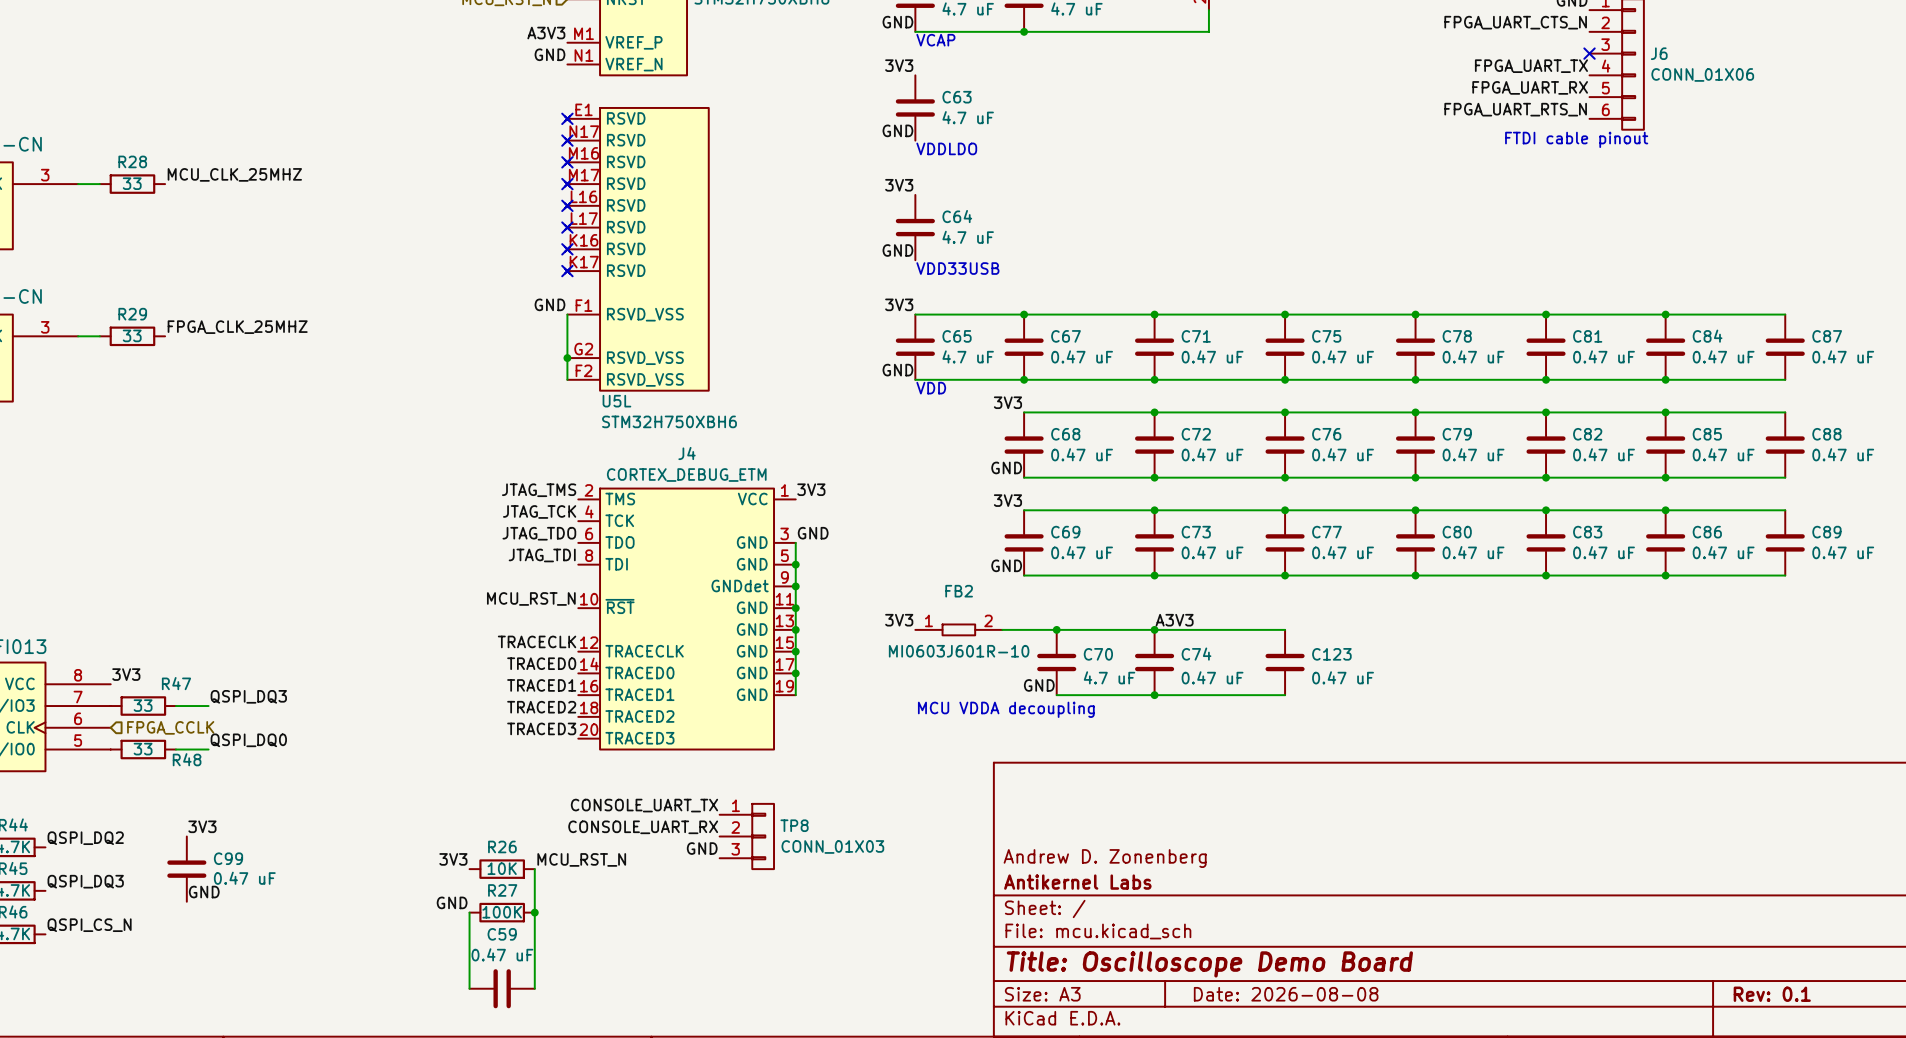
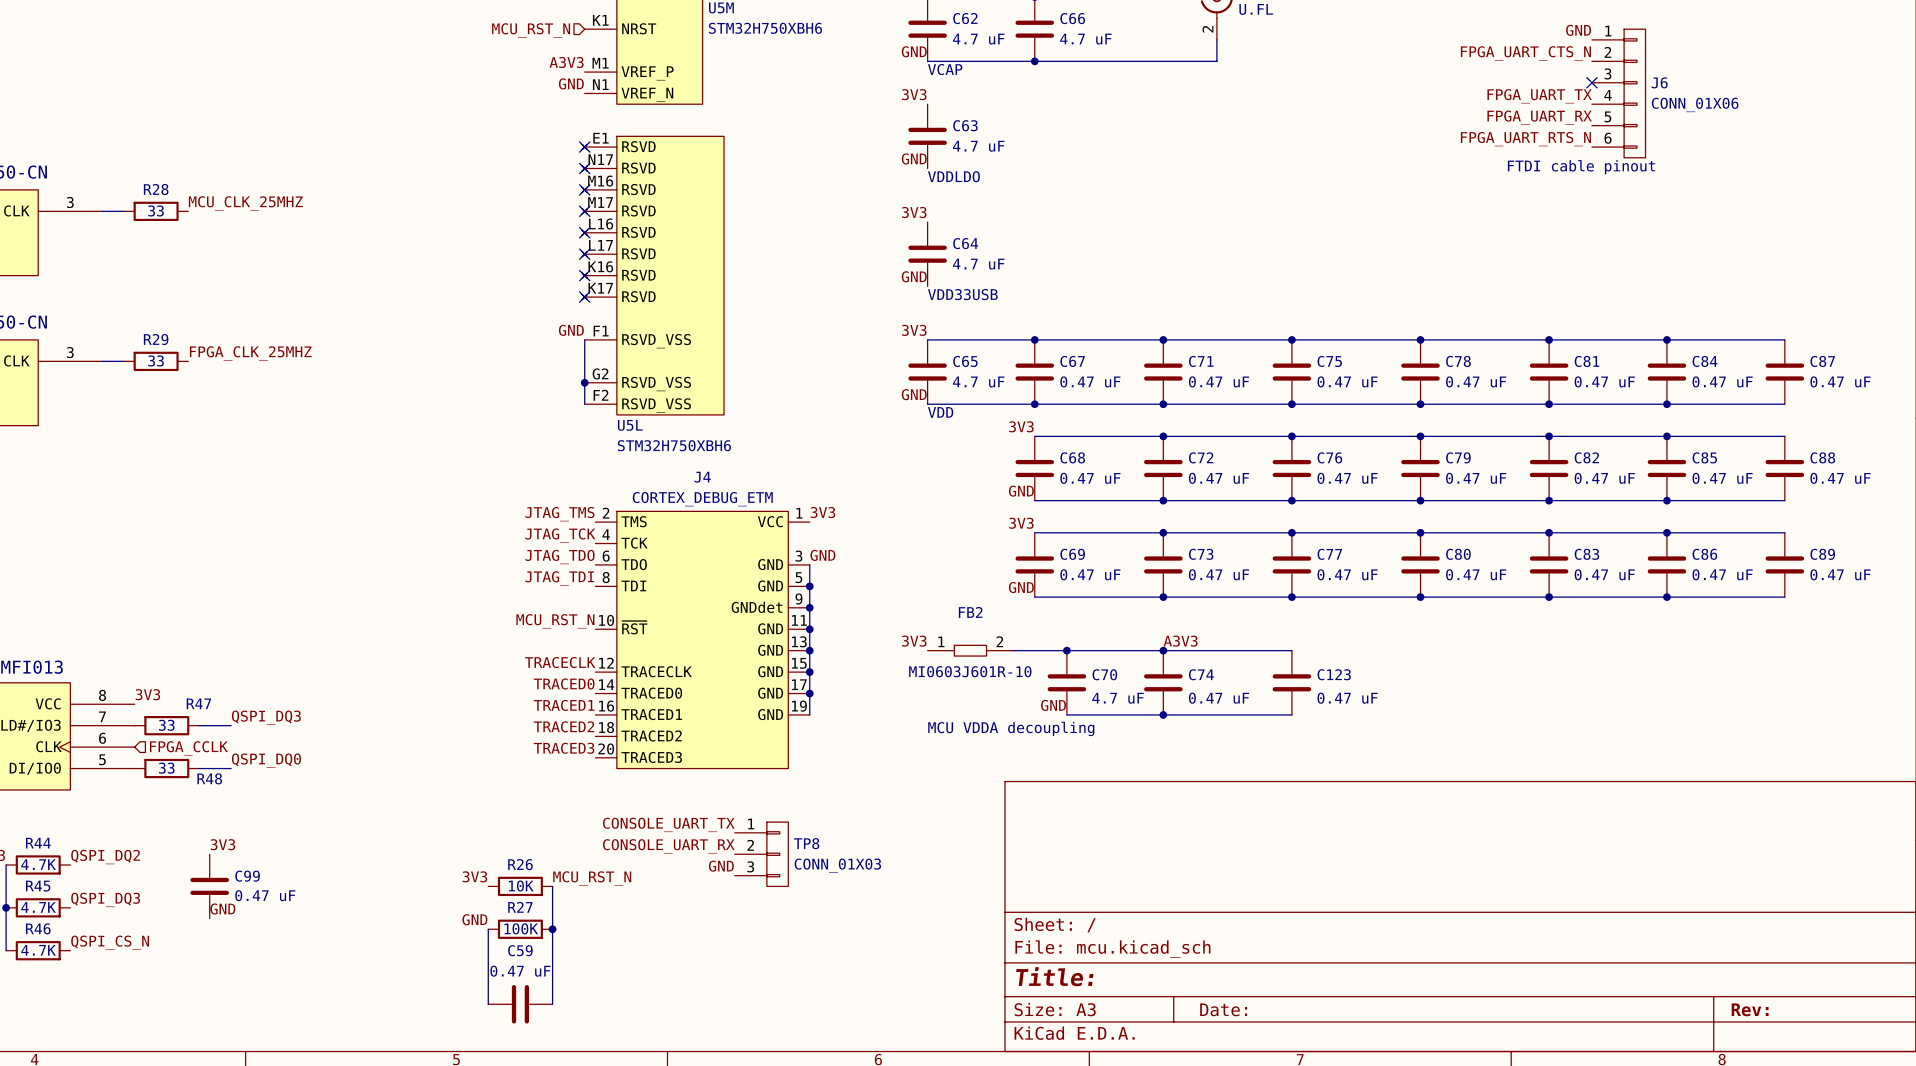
title block: Andrew D. Zonenberg (1105, 858) -> none
title block: Antikernel Labs (1077, 882) -> none
title block: Title: Oscilloscope Demo Board (1209, 964) -> Title: (1054, 976)
title block: Date: 2026-08-08 (1286, 994) -> Date: (1223, 1009)
title block: Rev: 0.1 (1772, 994) -> Rev: (1750, 1009)

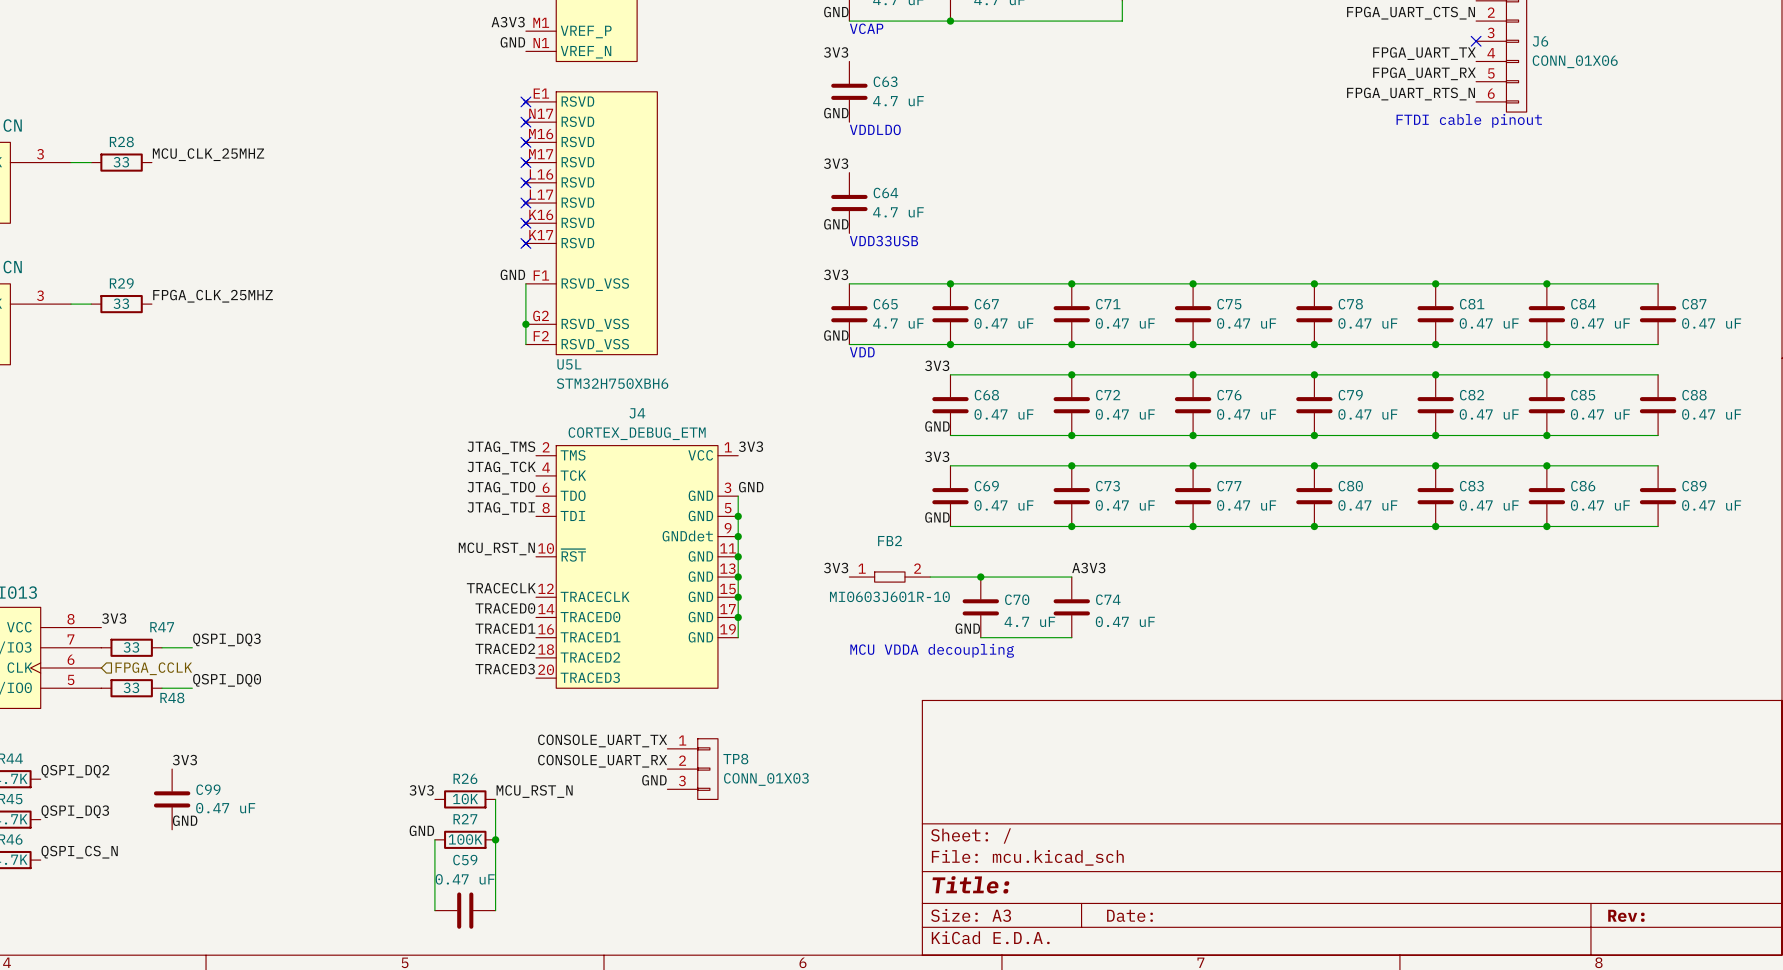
wire: (1163, 650) (1291, 650) -> none
junction: (1163, 650) -> none
C123: 0.47 uF (1291, 682) -> none
wire: (1163, 714) (1291, 714) -> none
junction: (1163, 714) -> none

